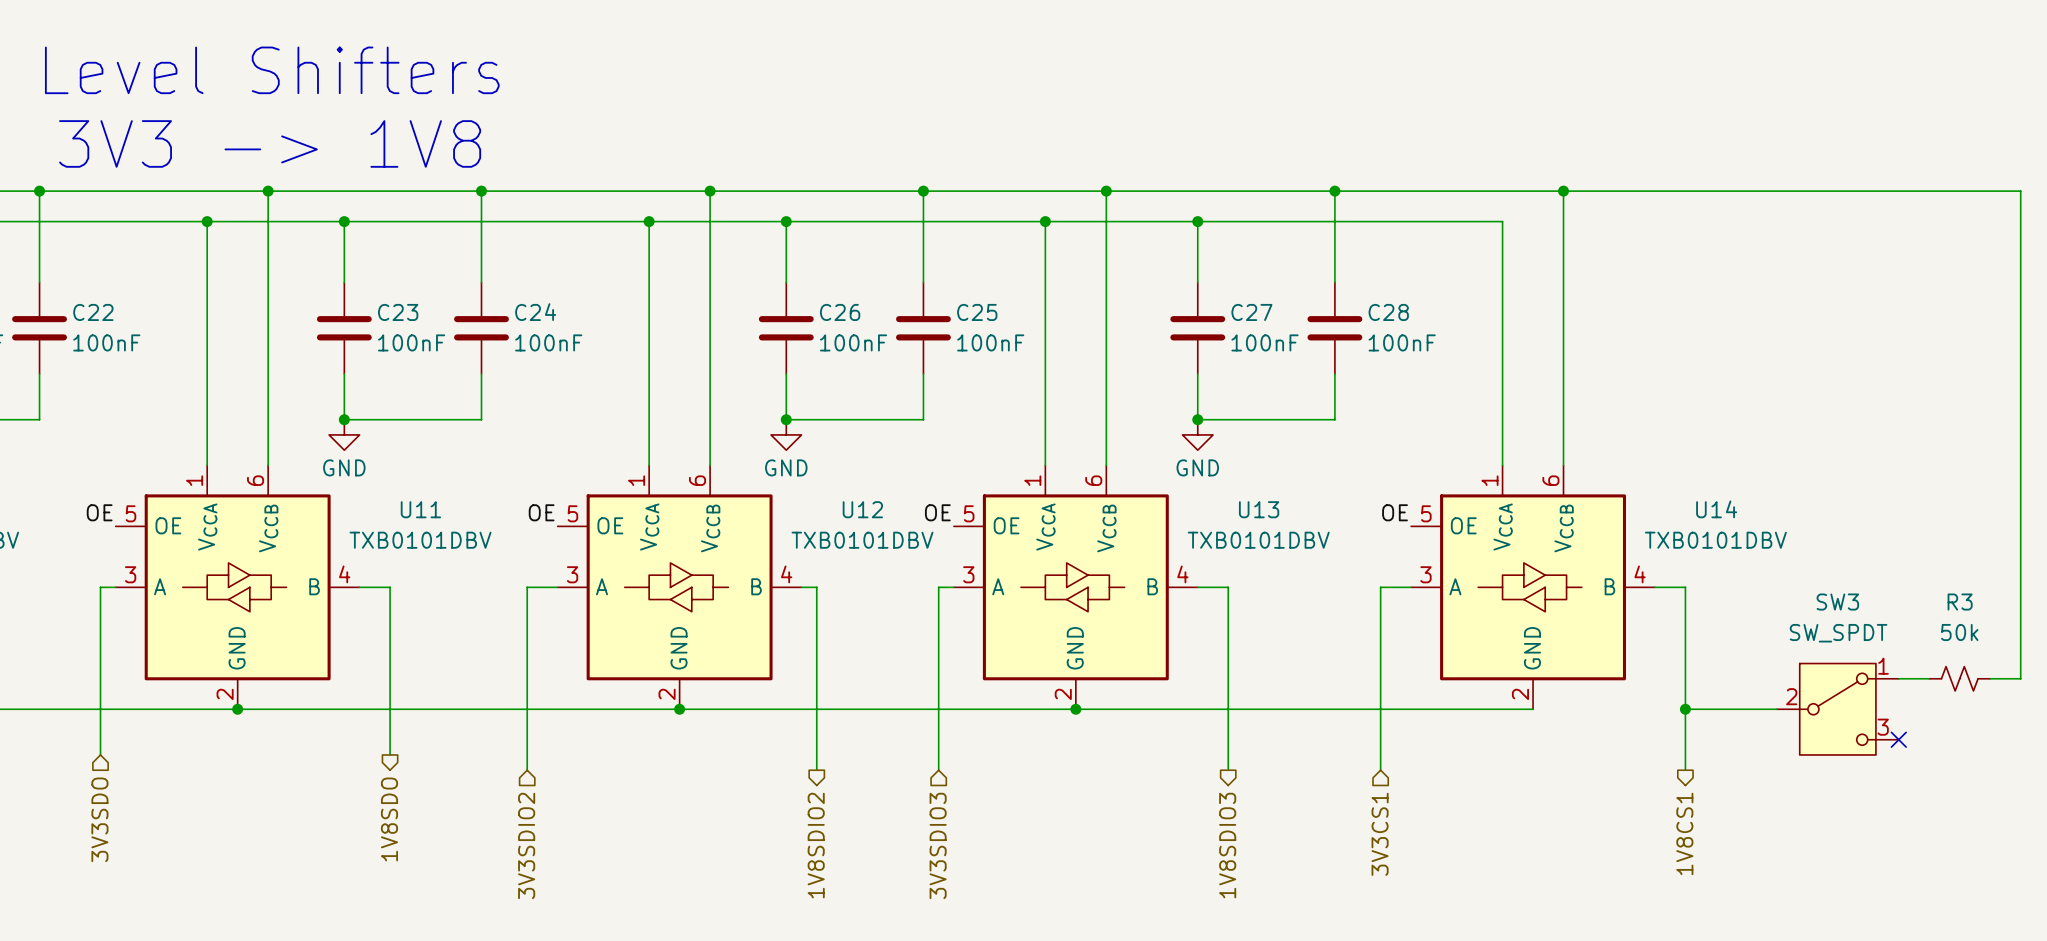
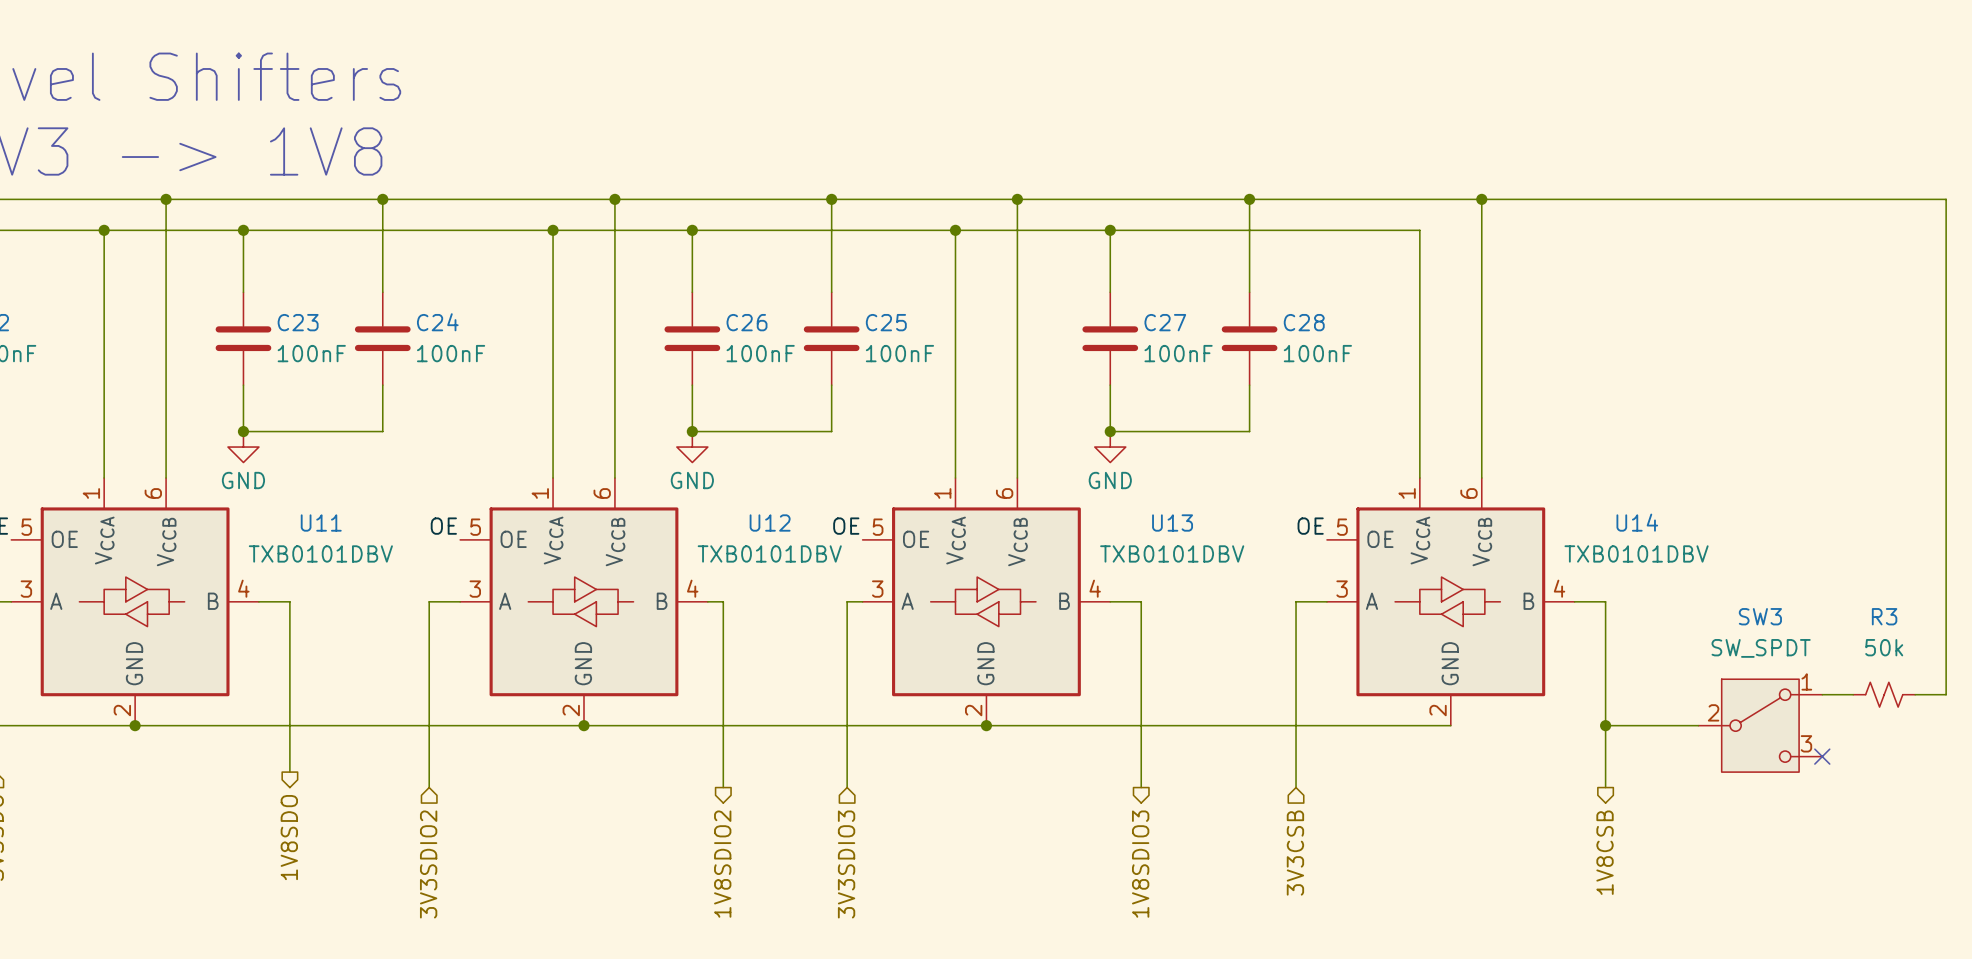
hierarchical label: 1V8CS1 (1684, 833) -> 1V8CSB (1605, 852)
hierarchical label: 3V3CS1 (1380, 834) -> 3V3CSB (1295, 853)

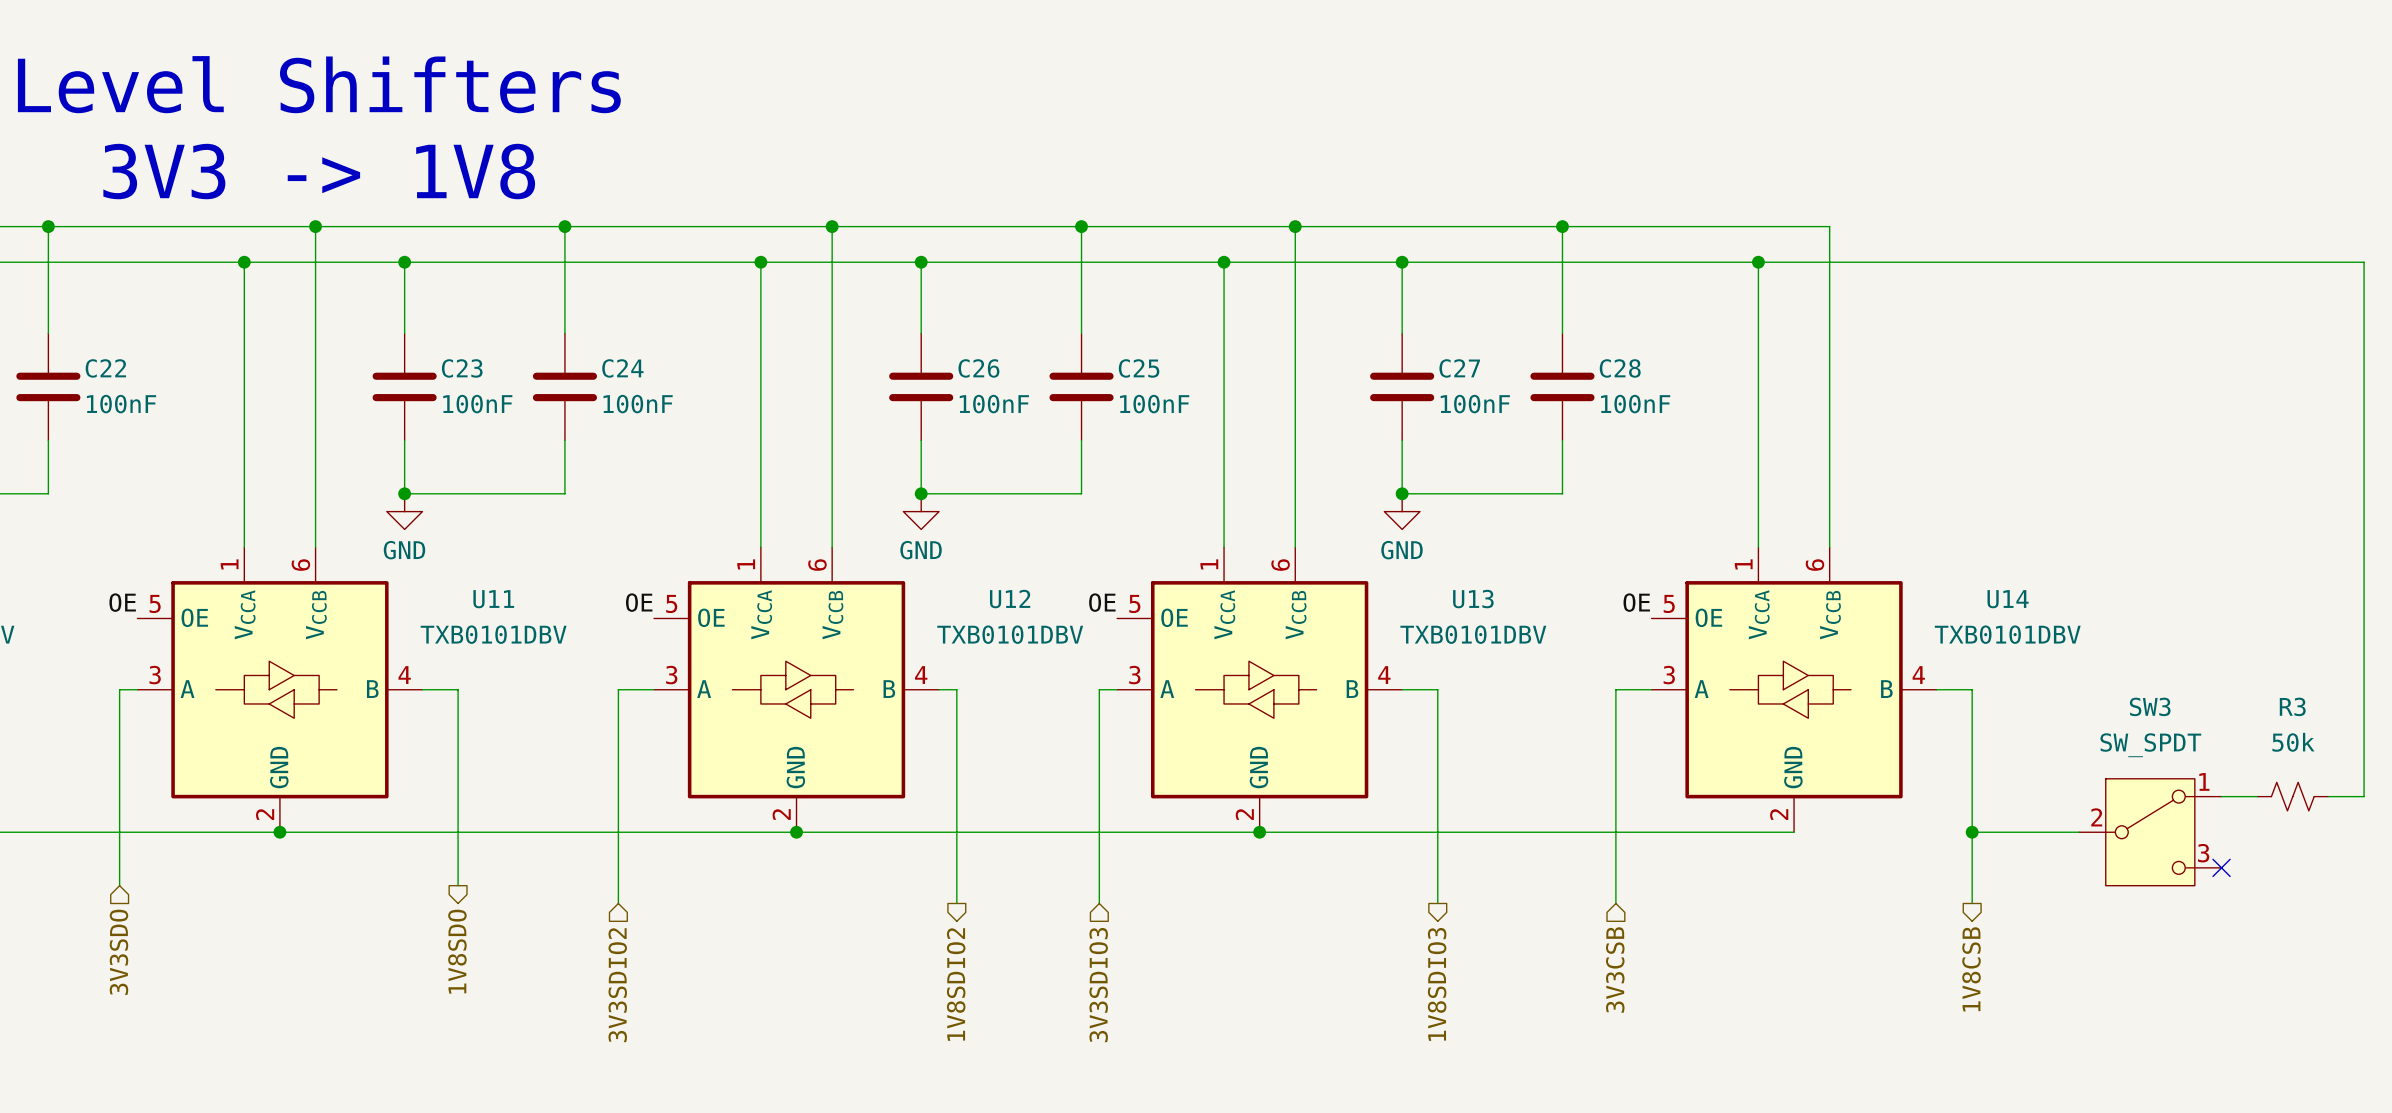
wire: (1481, 199) (1946, 199) (1946, 230) -> (1758, 262) (2364, 262)
junction position: (1481, 199) -> (1758, 262)

